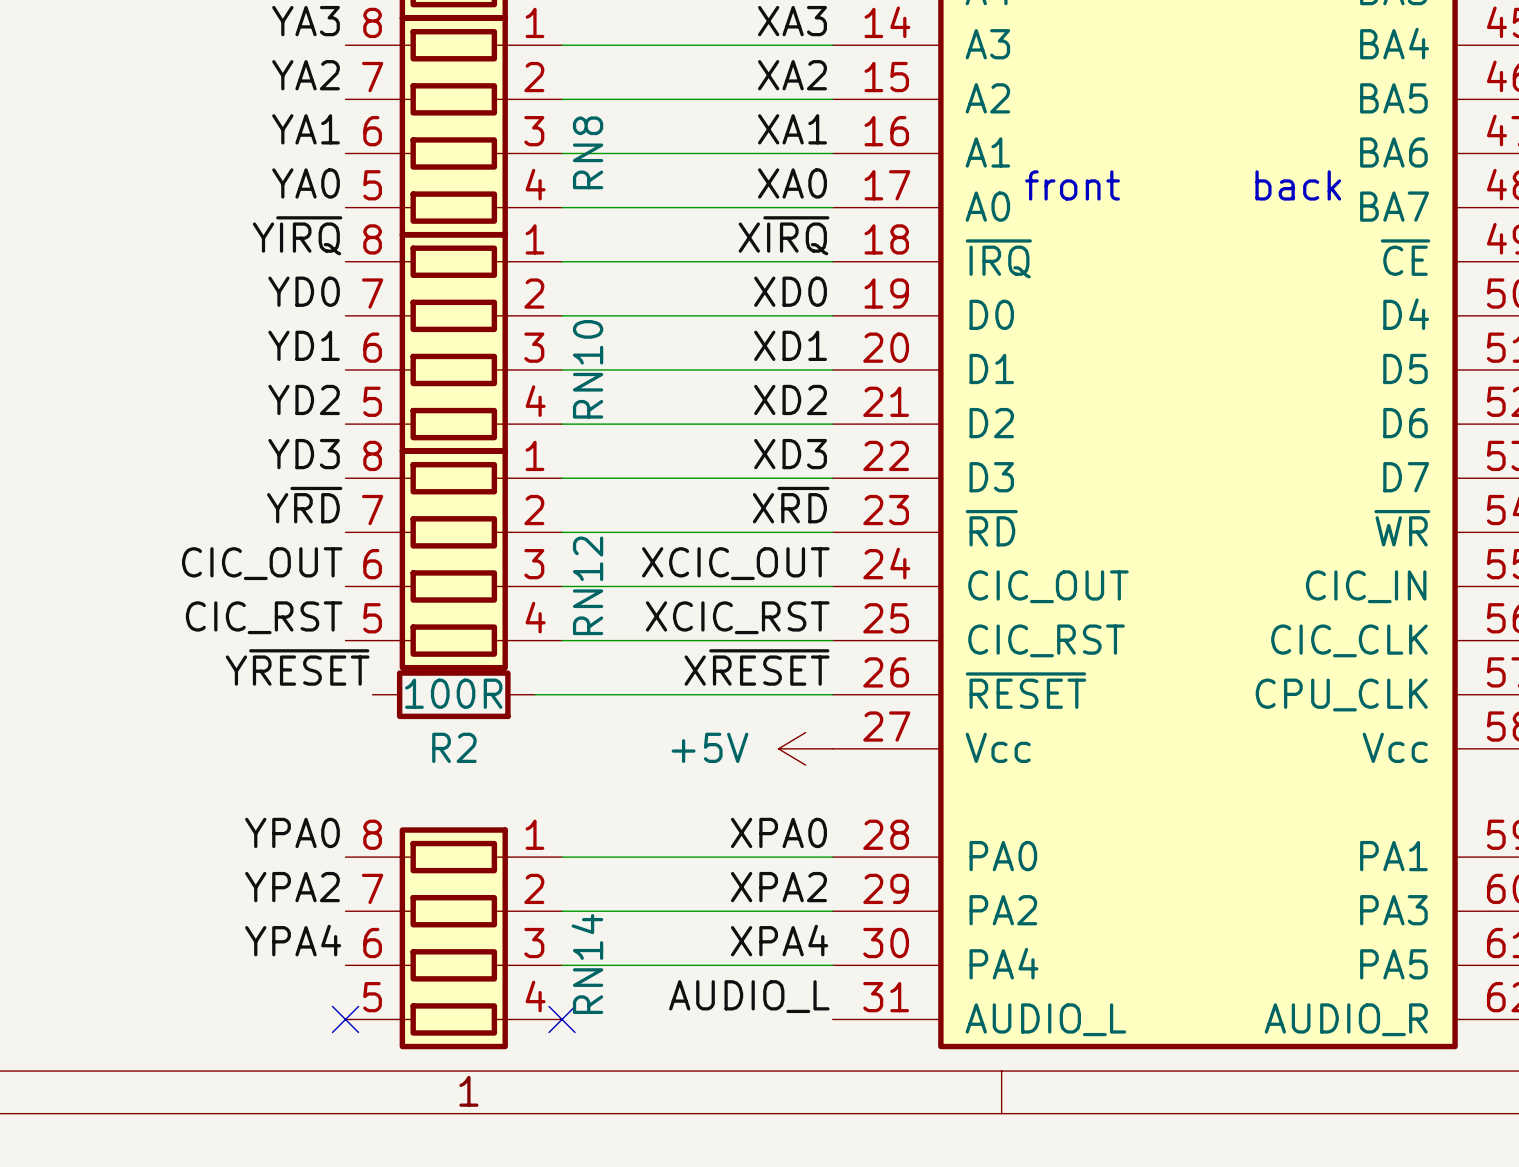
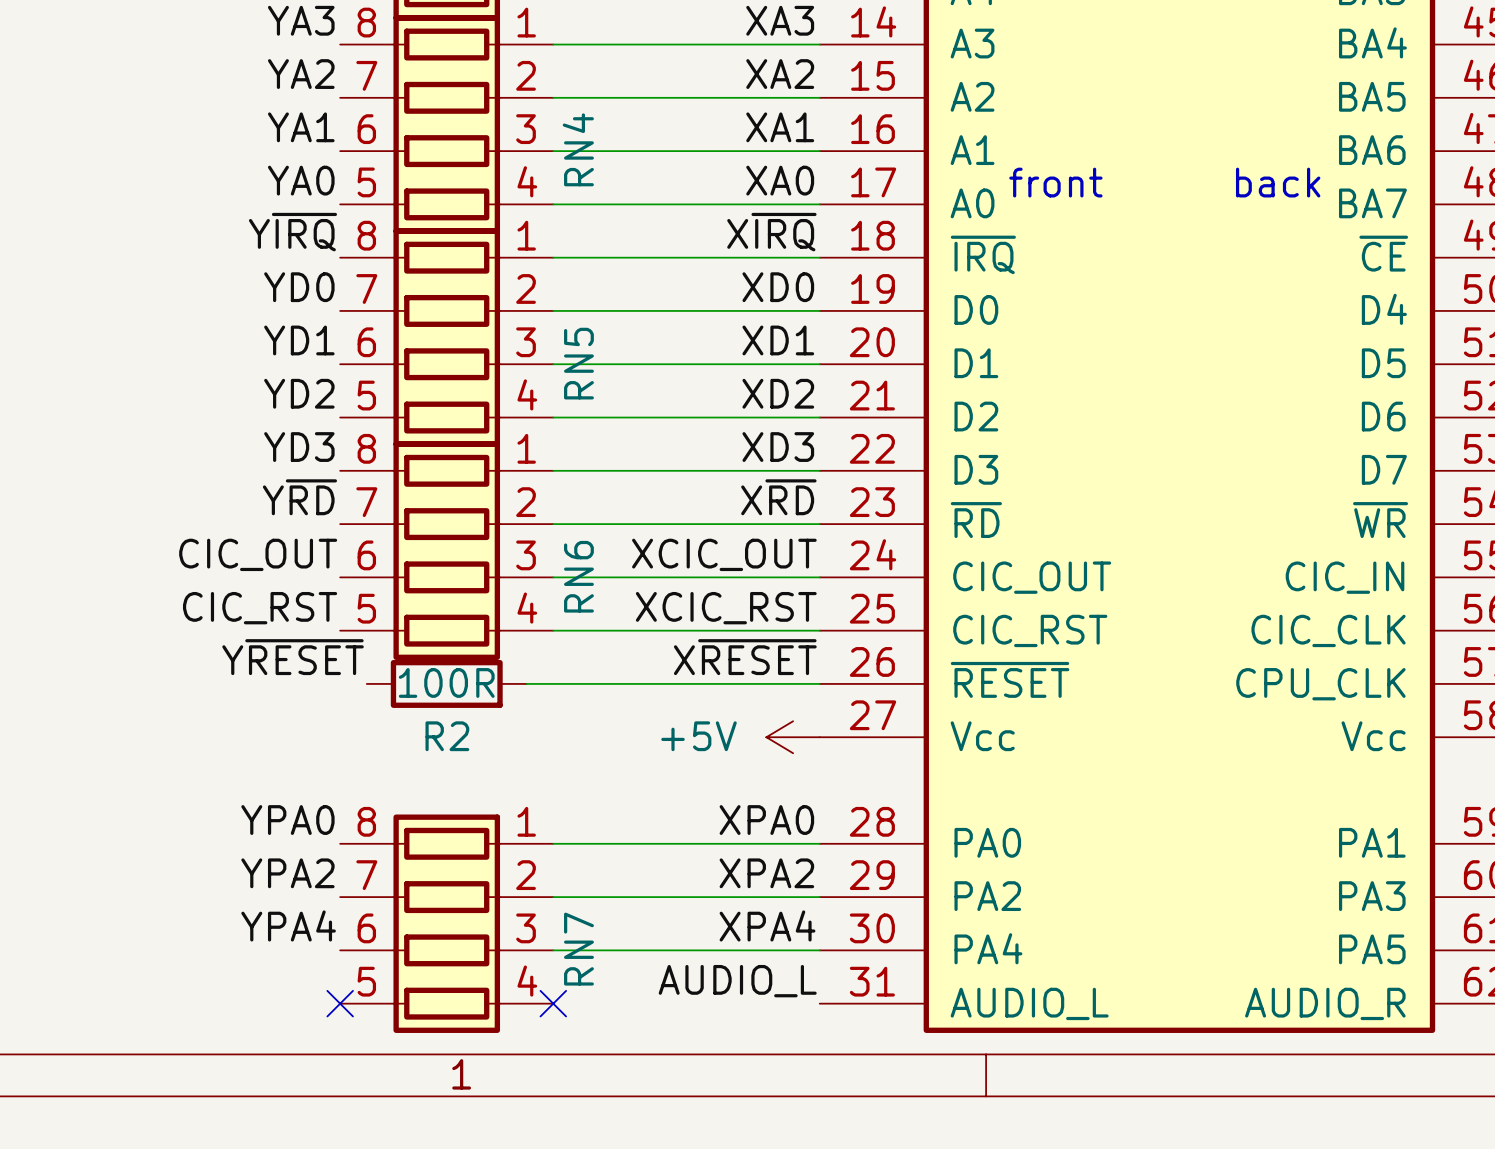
RN8 name: RN8 (588, 152) -> RN4 (578, 149)
RN10 name: RN10 (588, 369) -> RN5 (578, 363)
RN12 name: RN12 (588, 585) -> RN6 (578, 576)
RN14 name: RN14 (587, 964) -> RN7 (578, 949)

